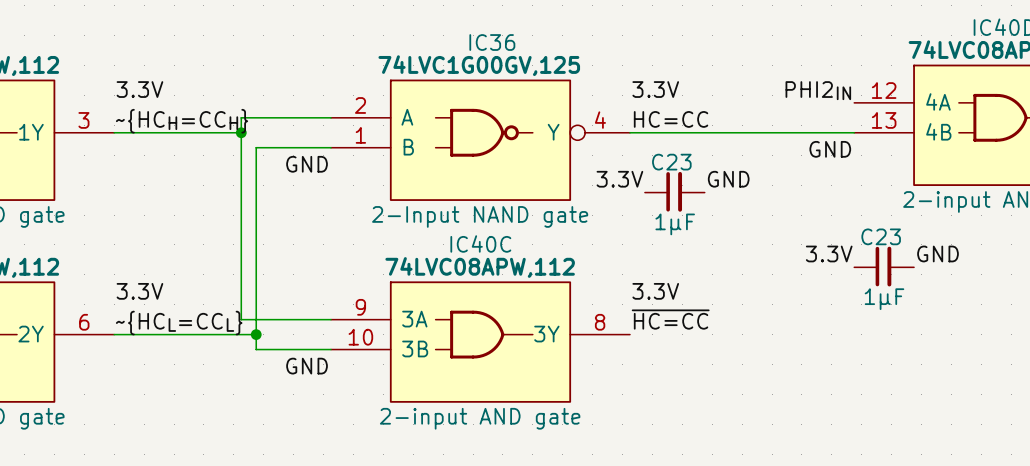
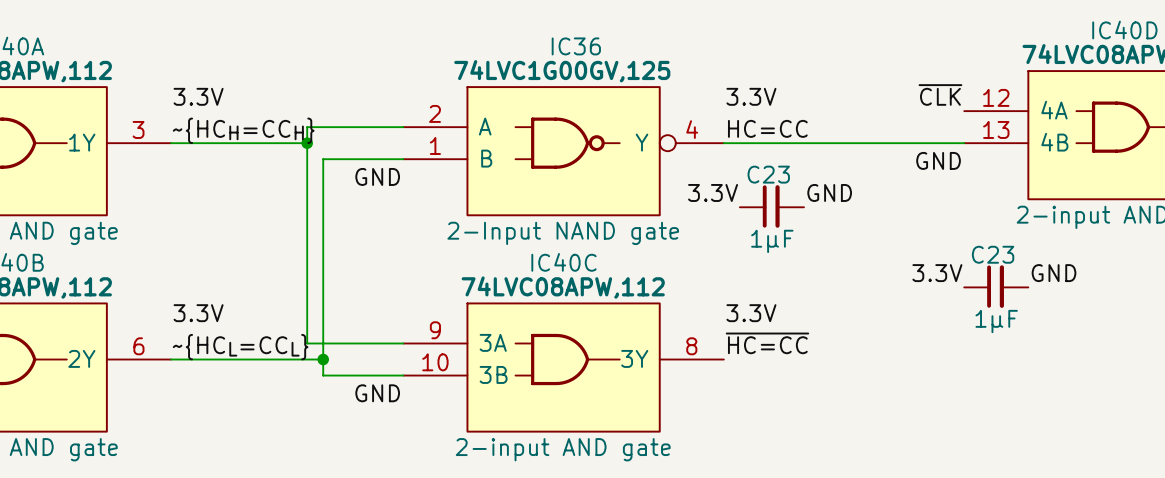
label: PHI2IN (818, 90) -> ~{CLK} (940, 94)

